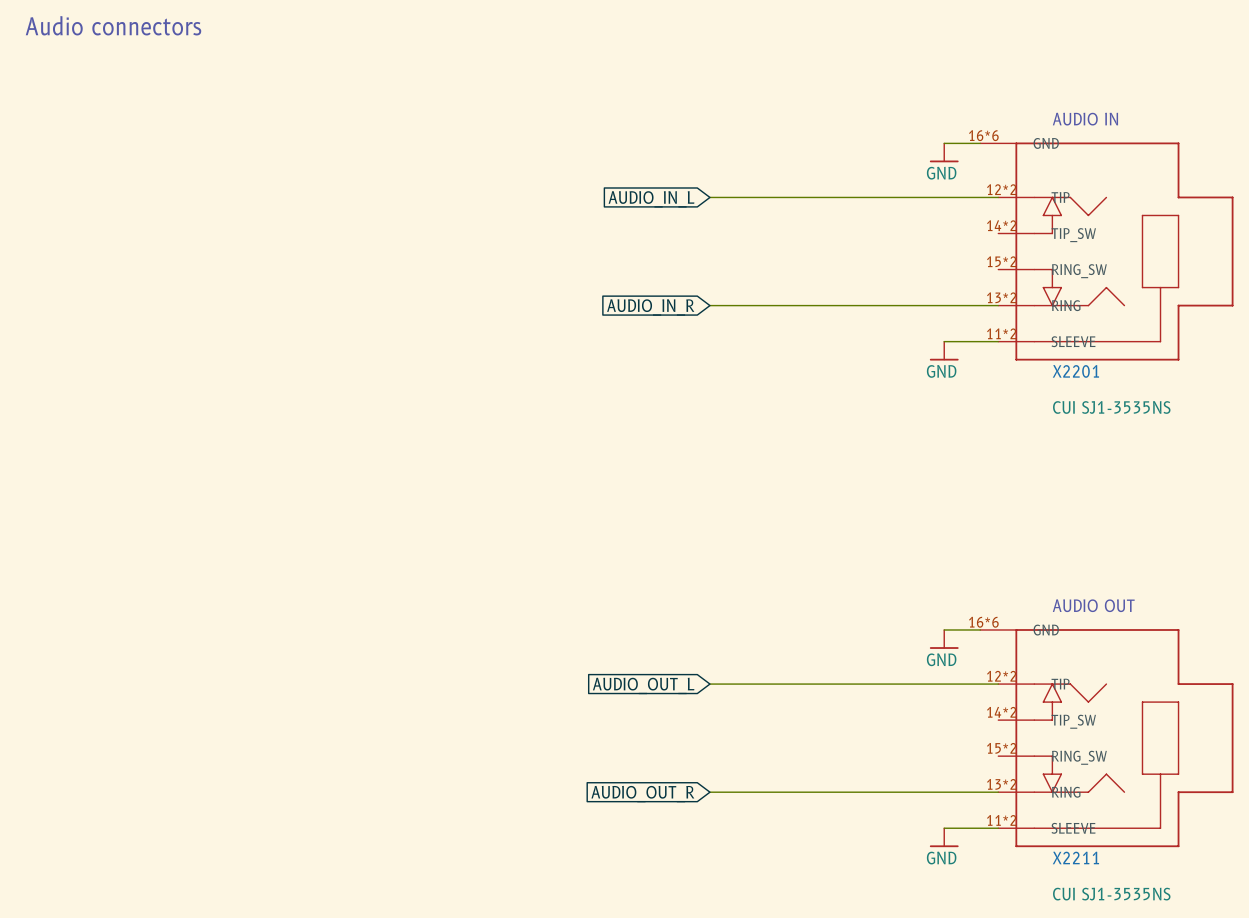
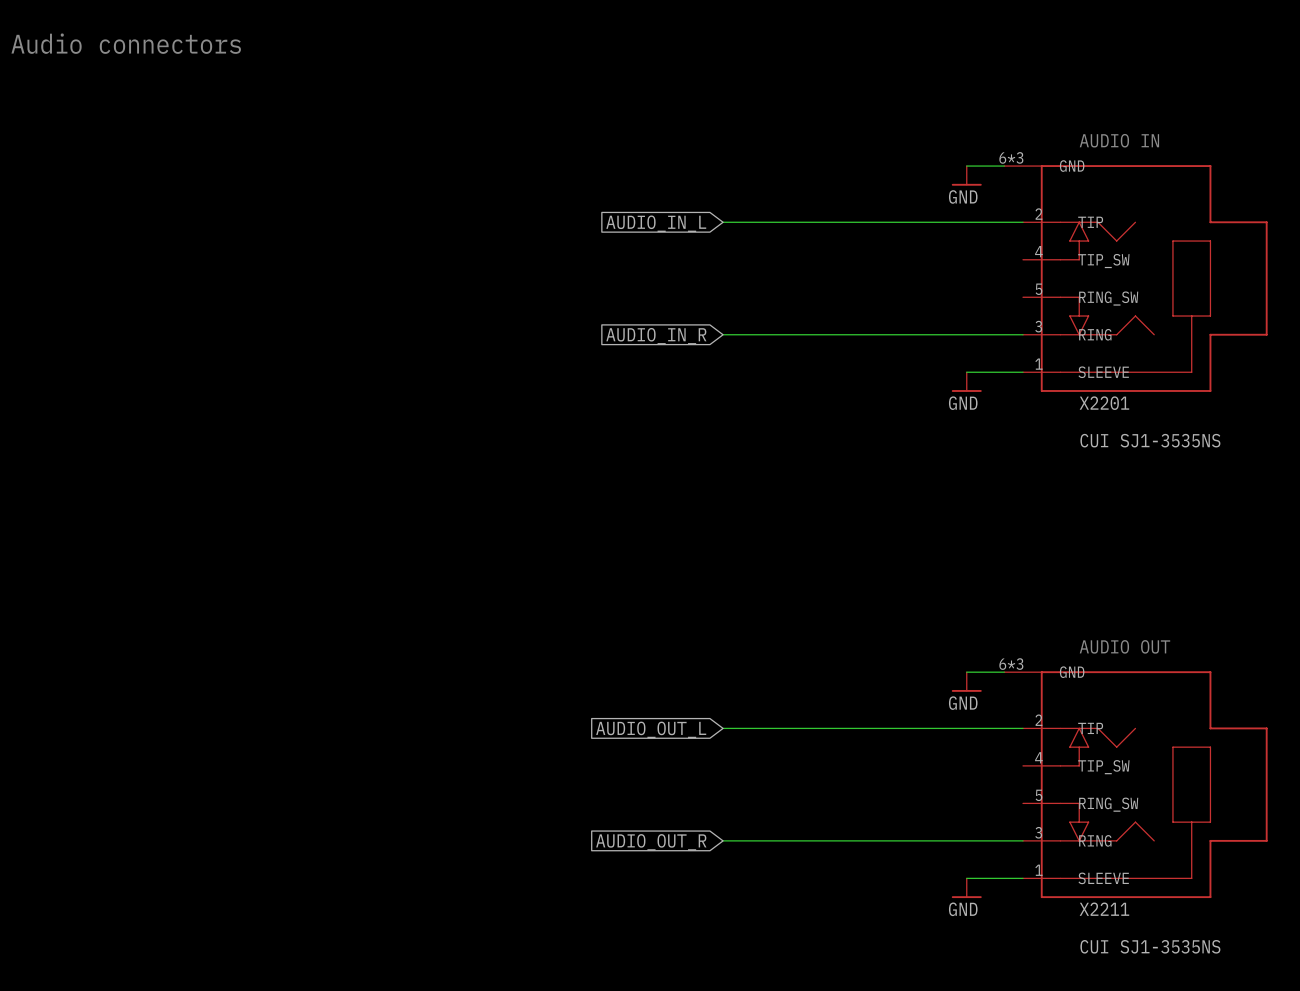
X2201 pin number: 16*6 (983, 135) -> 6*3 (1011, 157)
X2201 pin number: 12*2 (1001, 189) -> 2 (1038, 214)
X2201 pin number: 14*2 (1001, 225) -> 4 (1038, 251)
X2201 pin number: 15*2 (1001, 261) -> 5 (1038, 289)
X2201 pin number: 13*2 (1001, 297) -> 3 (1038, 326)
X2201 pin number: 11*2 (1001, 333) -> 1 (1038, 364)
X2211 pin number: 16*6 (983, 622) -> 6*3 (1011, 664)
X2211 pin number: 12*2 (1001, 676) -> 2 (1038, 720)
X2211 pin number: 14*2 (1001, 712) -> 4 (1038, 757)
X2211 pin number: 15*2 (1001, 748) -> 5 (1038, 795)
X2211 pin number: 13*2 (1001, 784) -> 3 (1038, 832)
X2211 pin number: 11*2 (1001, 820) -> 1 (1038, 870)

